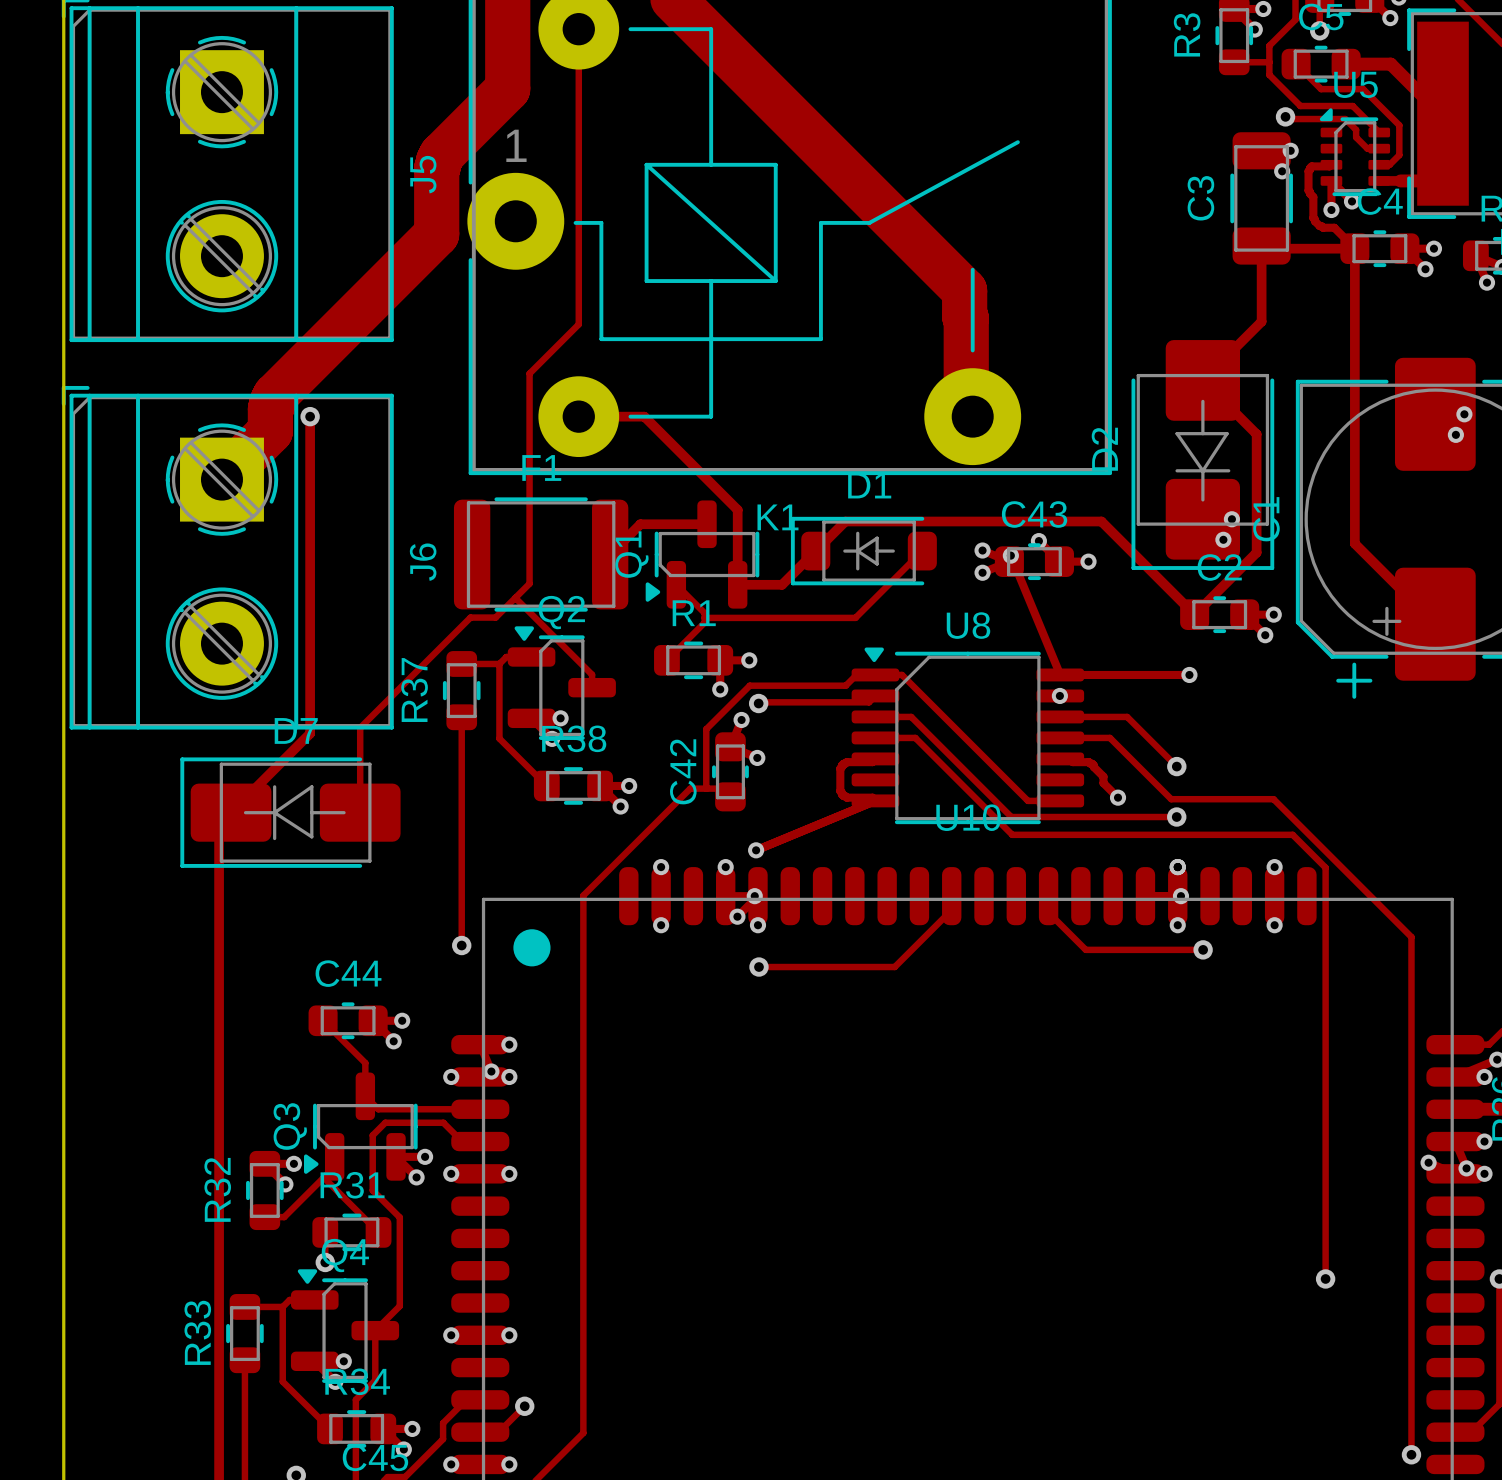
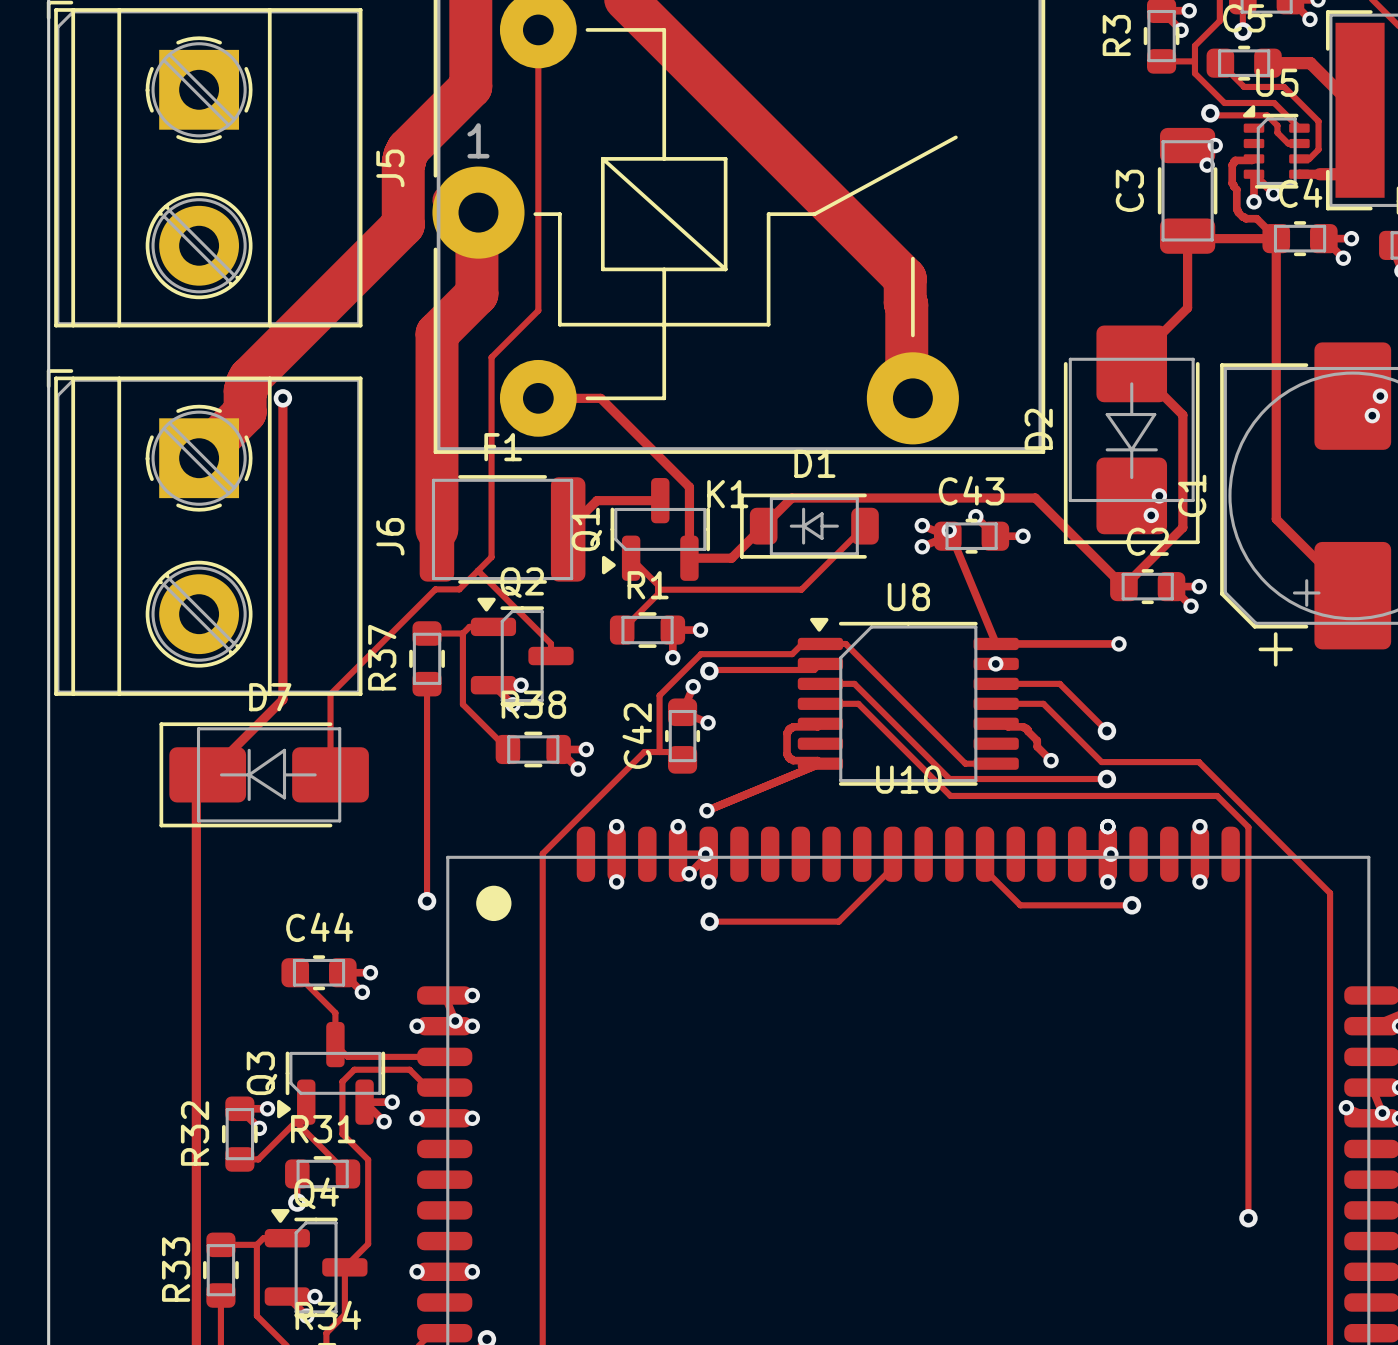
track: none -> (447, 200) (455, 207) (473, 207) (478, 212) (476, 214) (476, 293) (437, 333) (436, 529)

